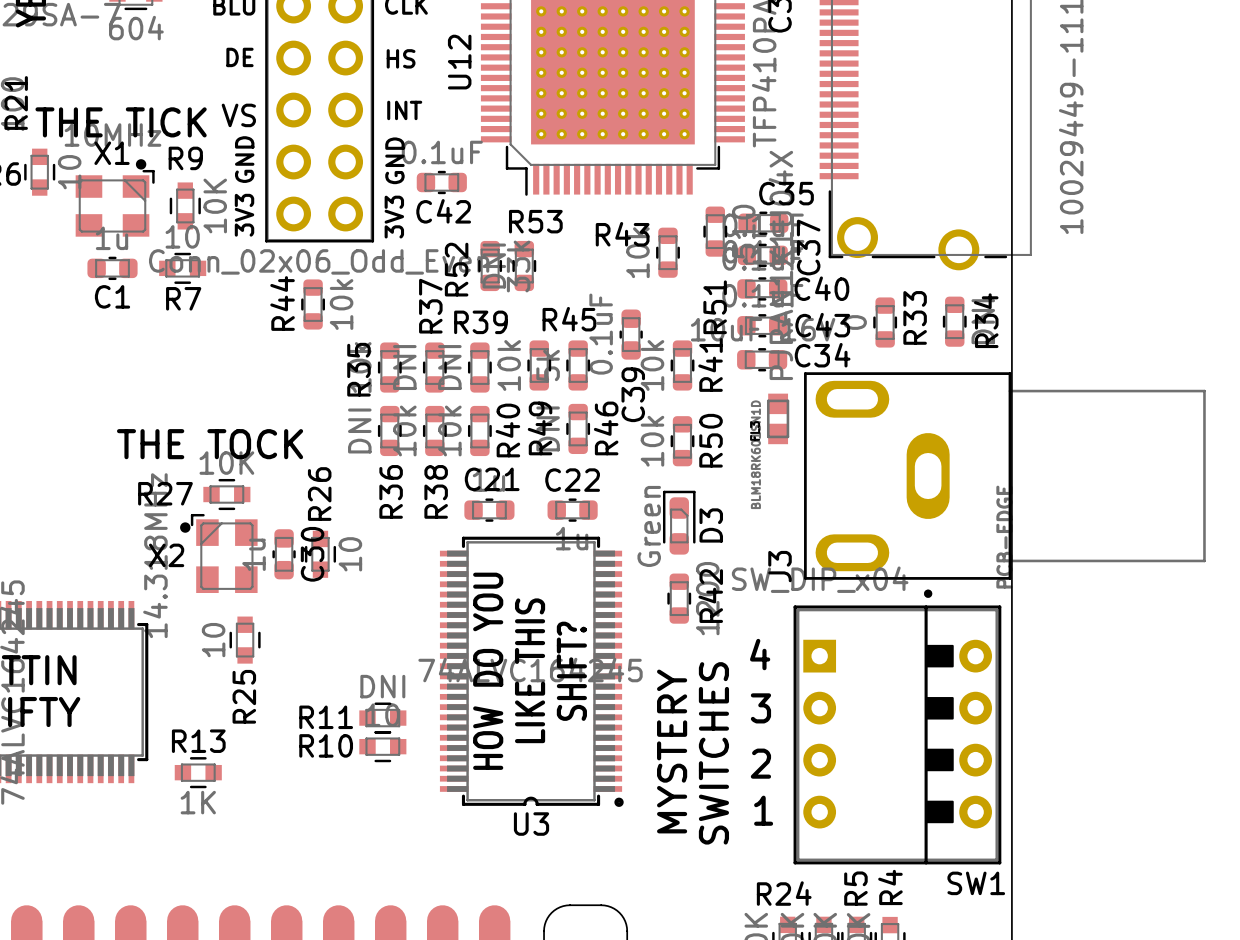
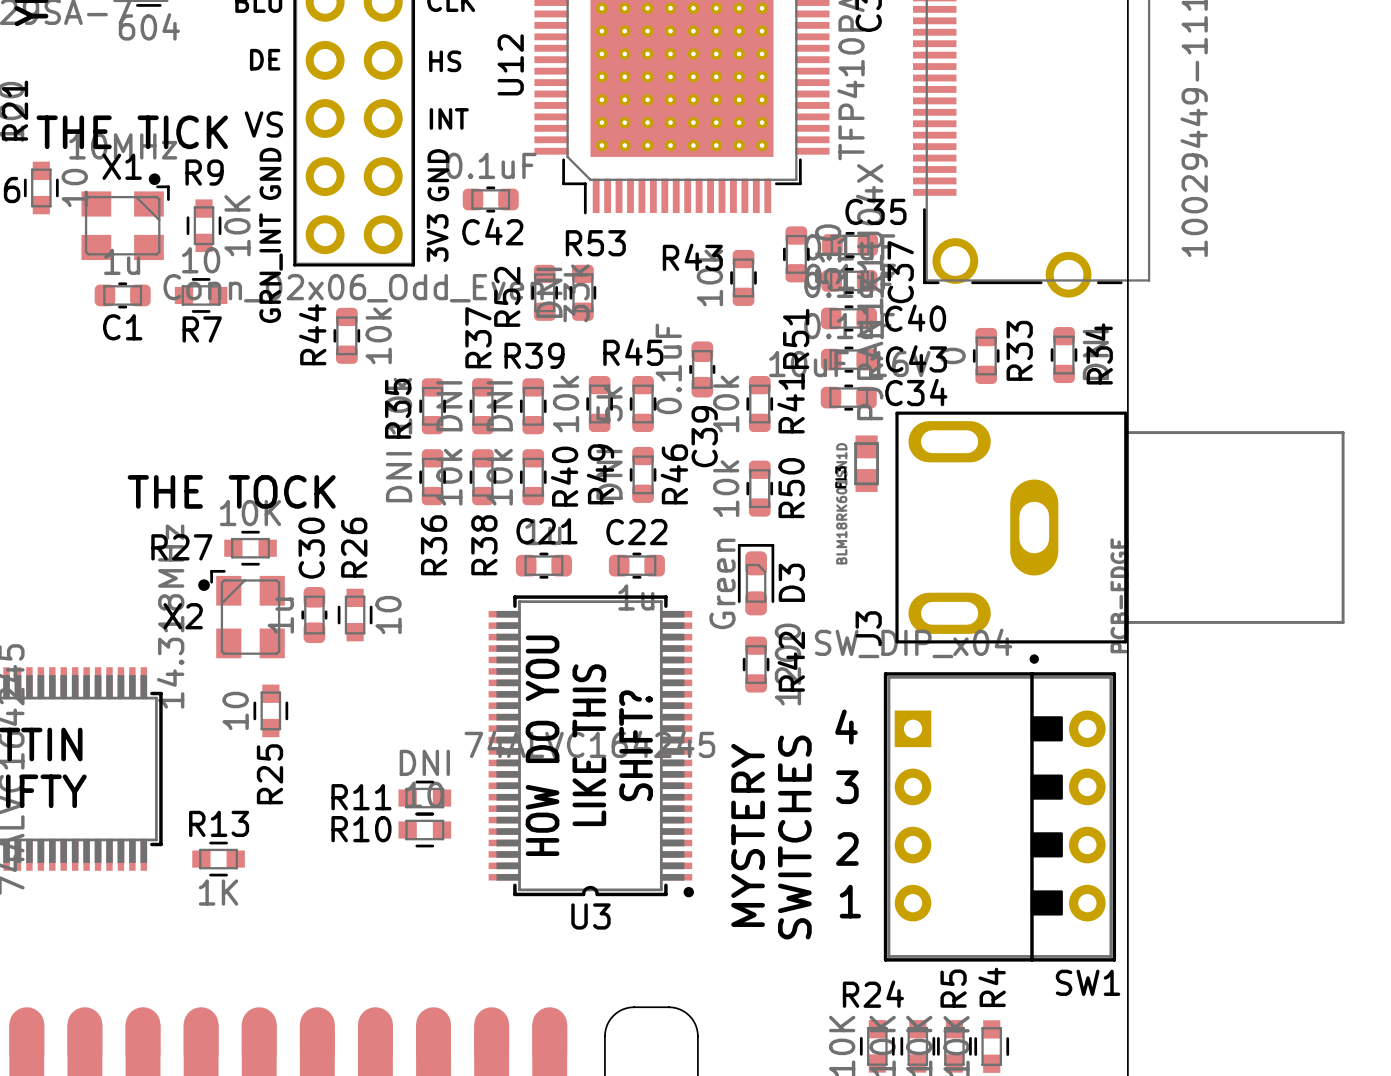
text: 3V3 (244, 215) -> none
text: none -> GRN_INT (271, 268)
C30 name position: C30 (312, 554) -> C30 (311, 548)

